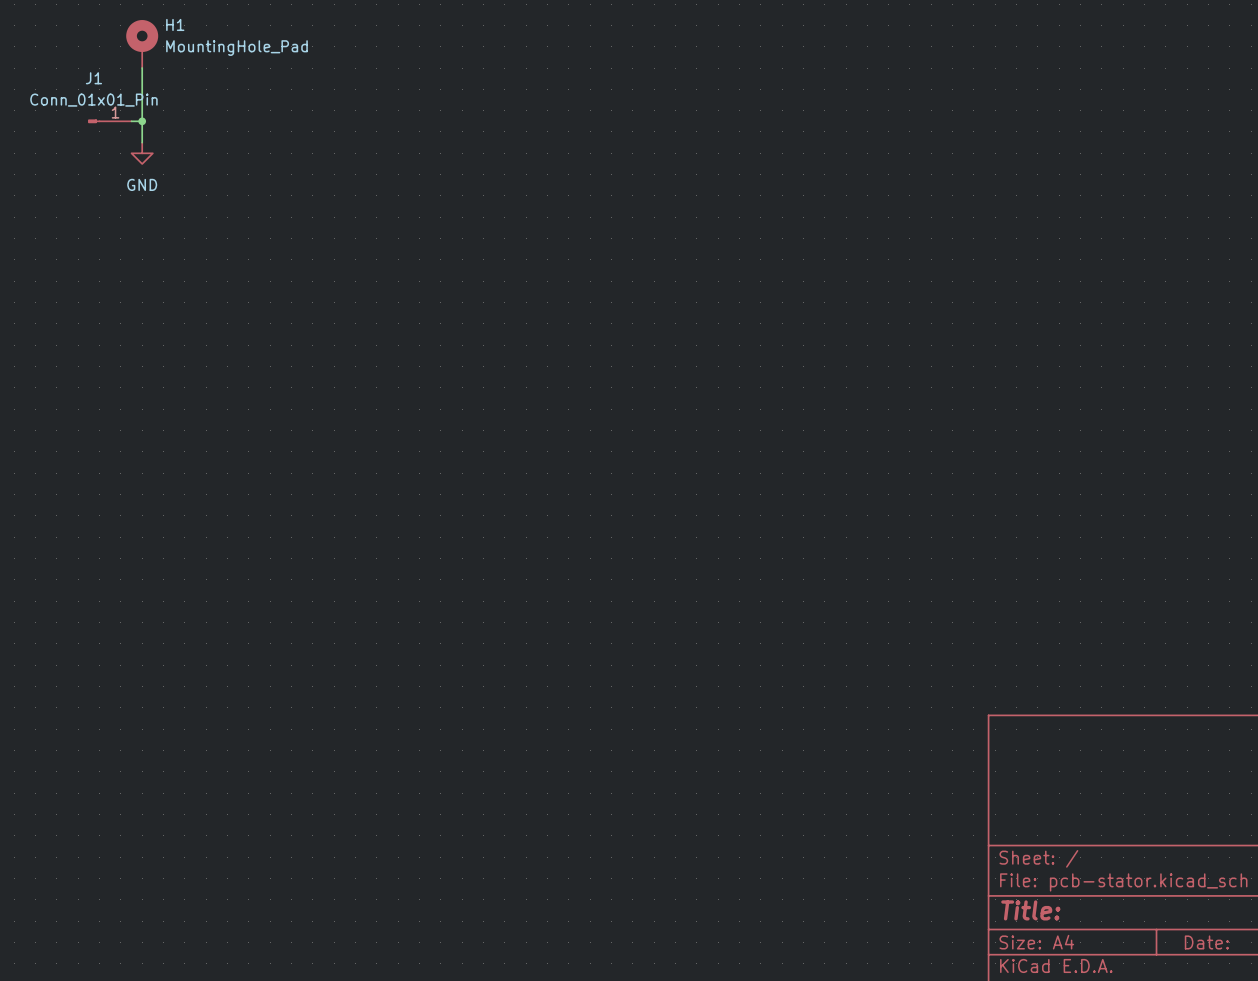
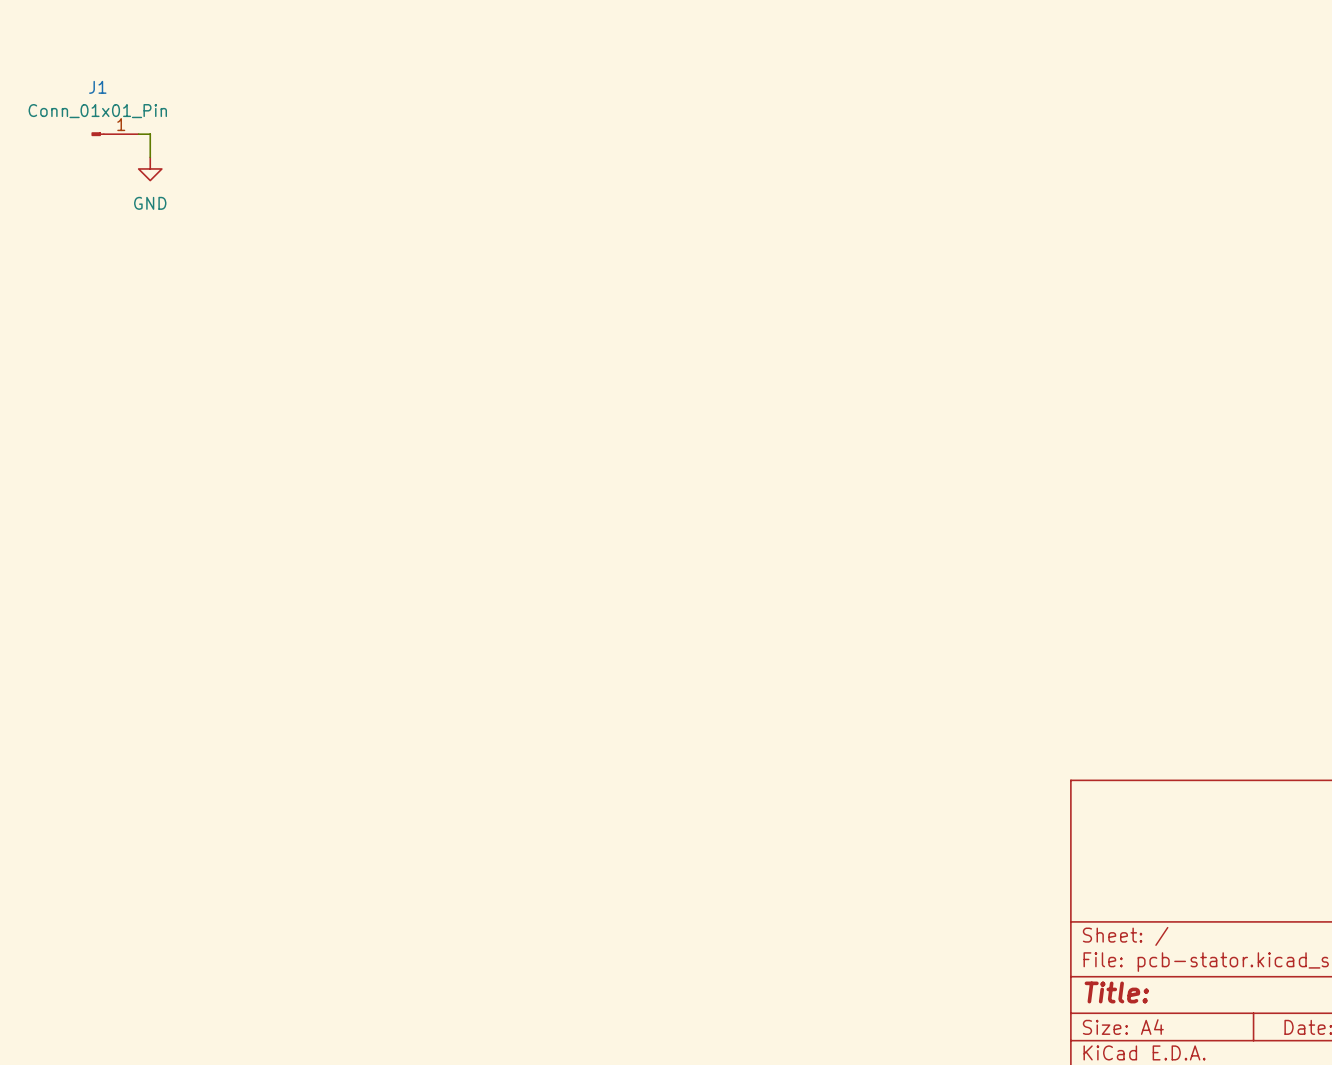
H1: MountingHole_Pad (142, 44) -> none
wire: (142, 68) (142, 121) -> none
junction: (142, 121) -> none

